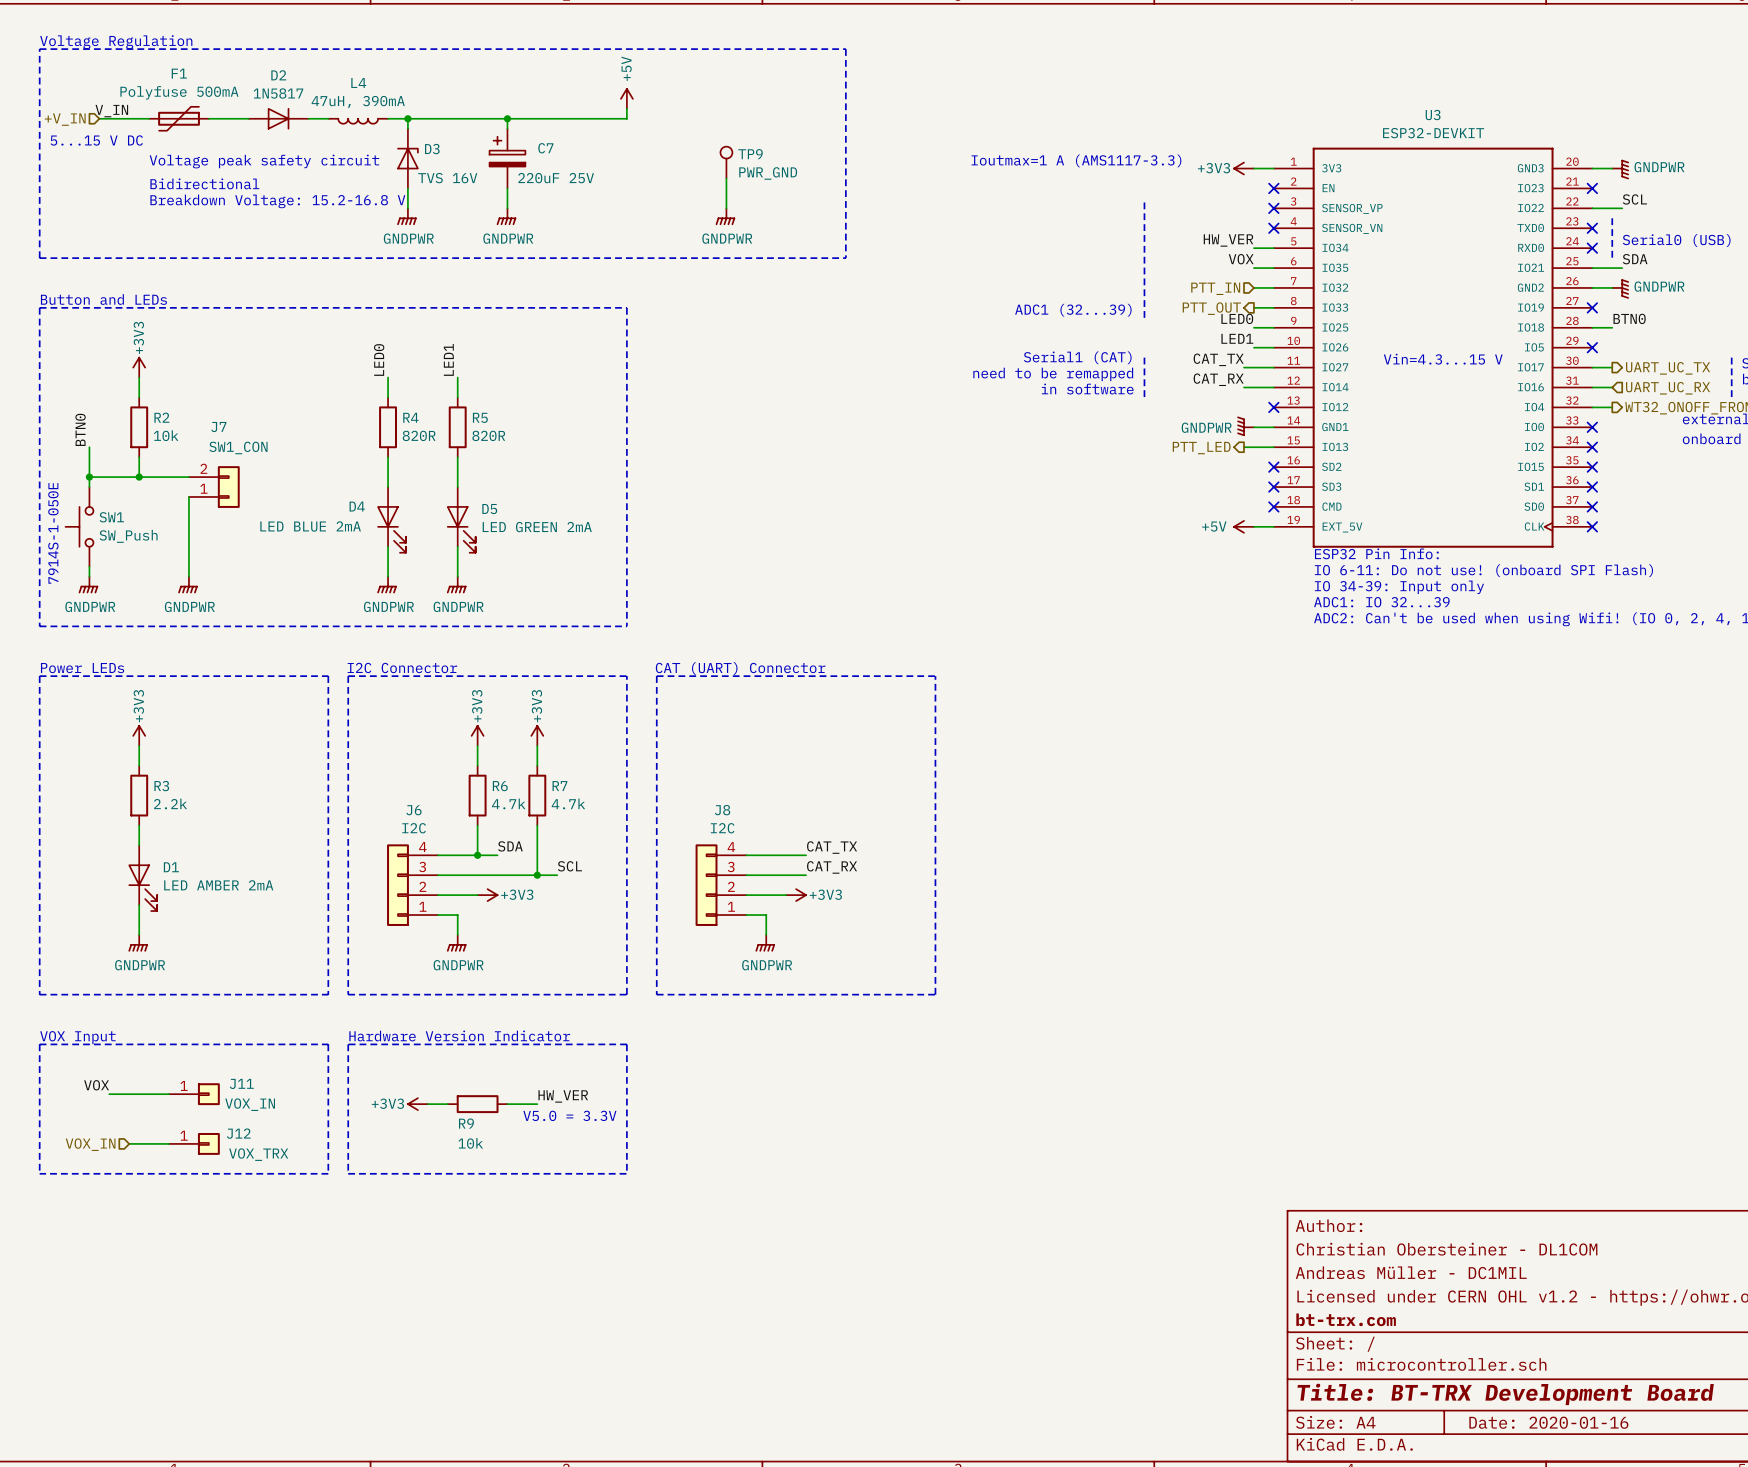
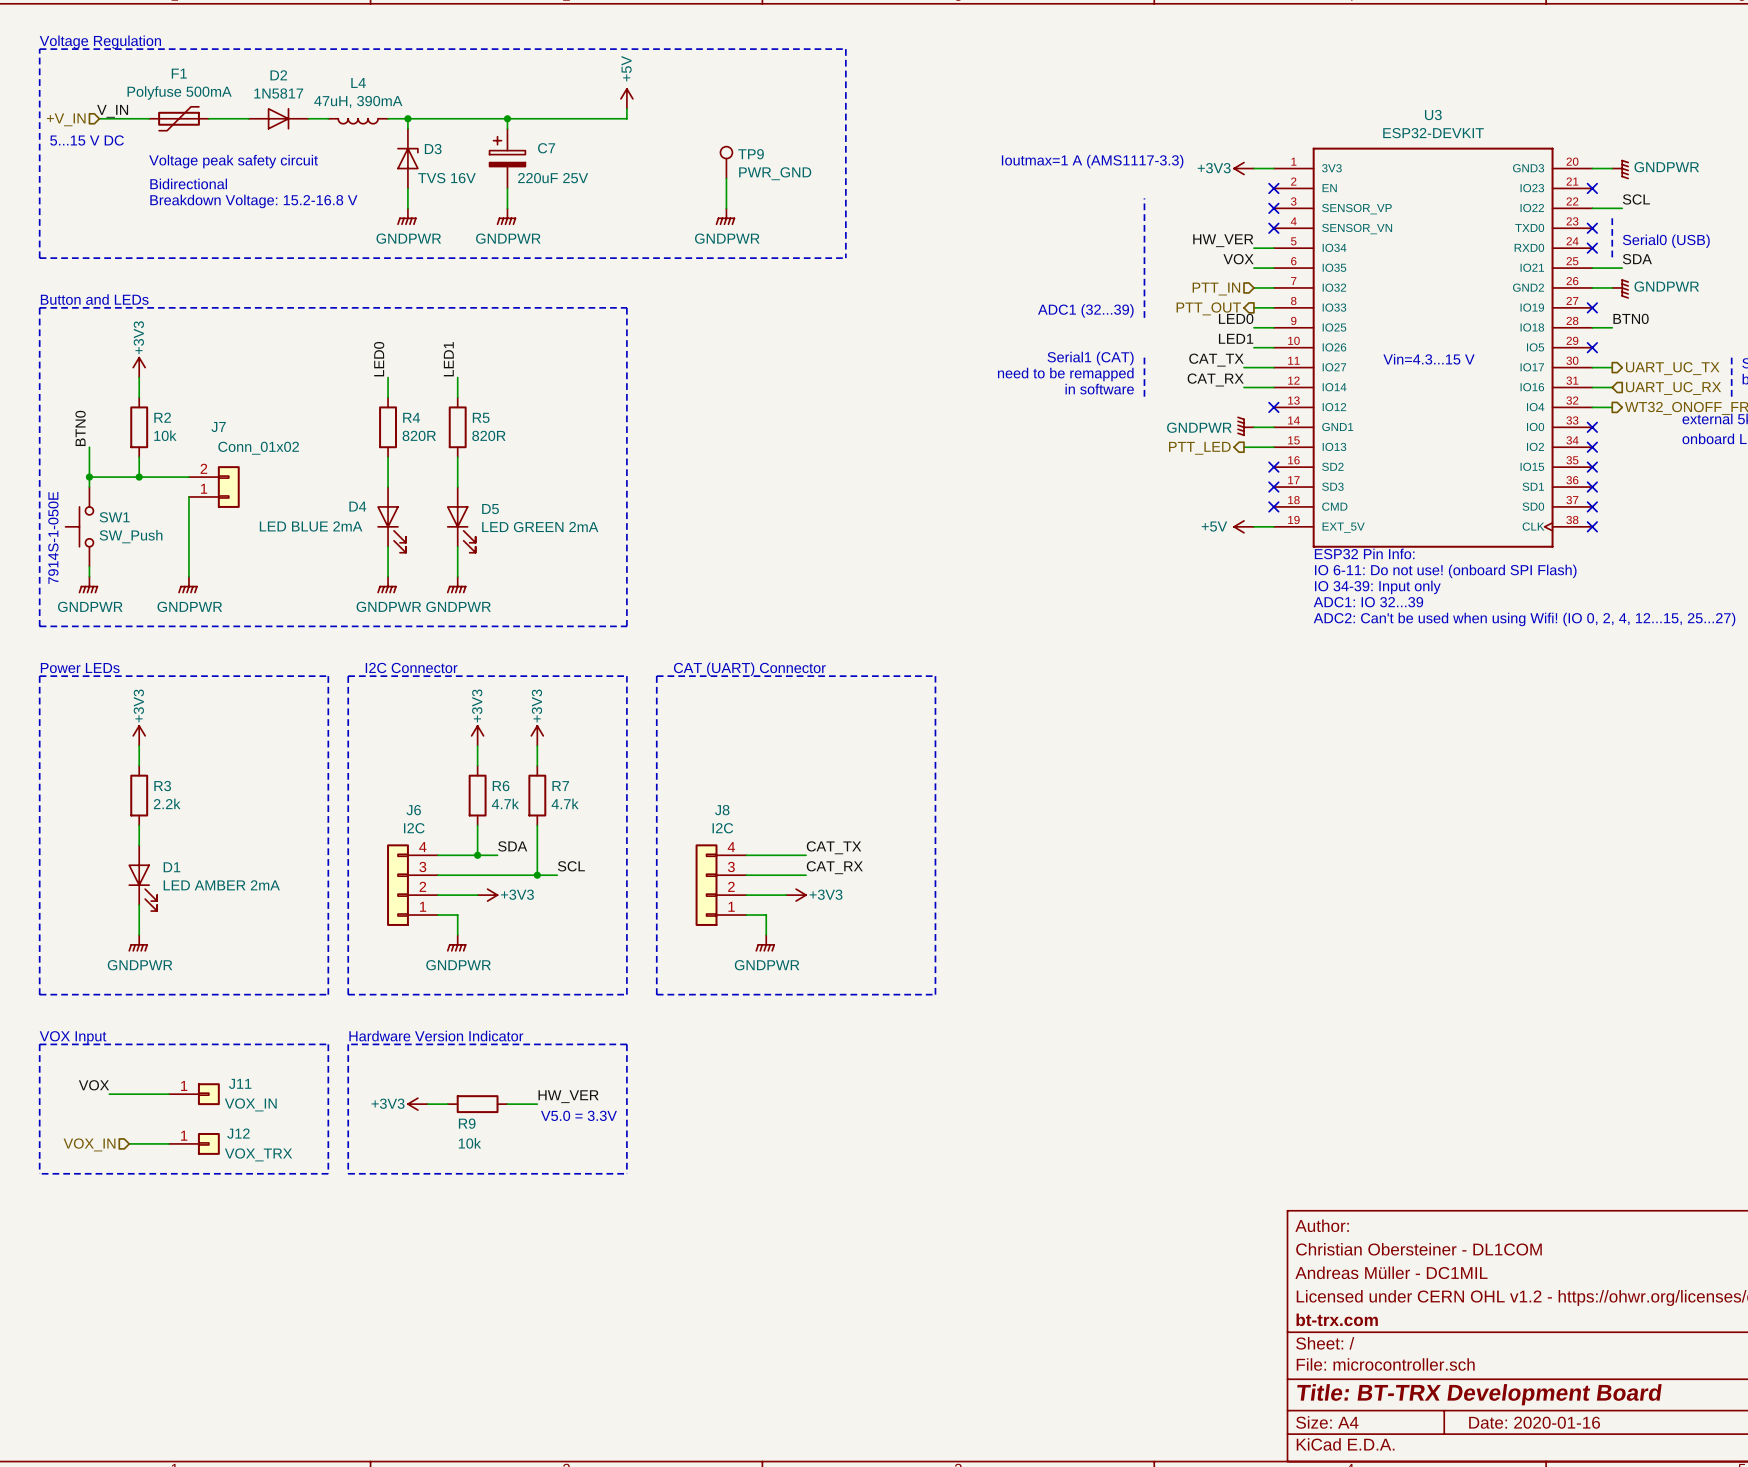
J7 value: SW1_CON (238, 447) -> Conn_01x02 (258, 448)

